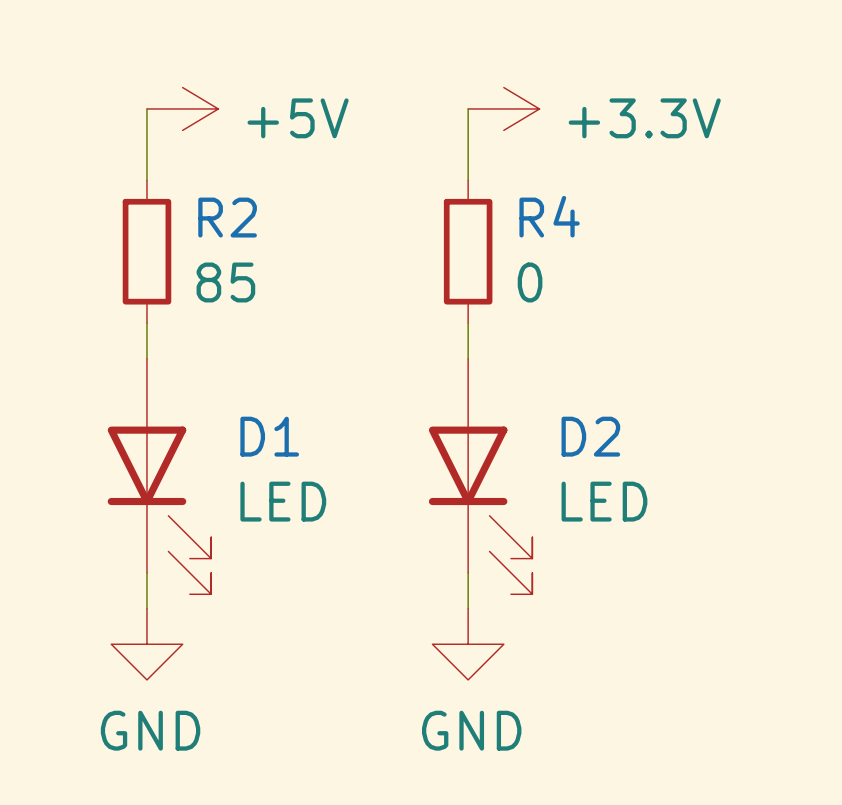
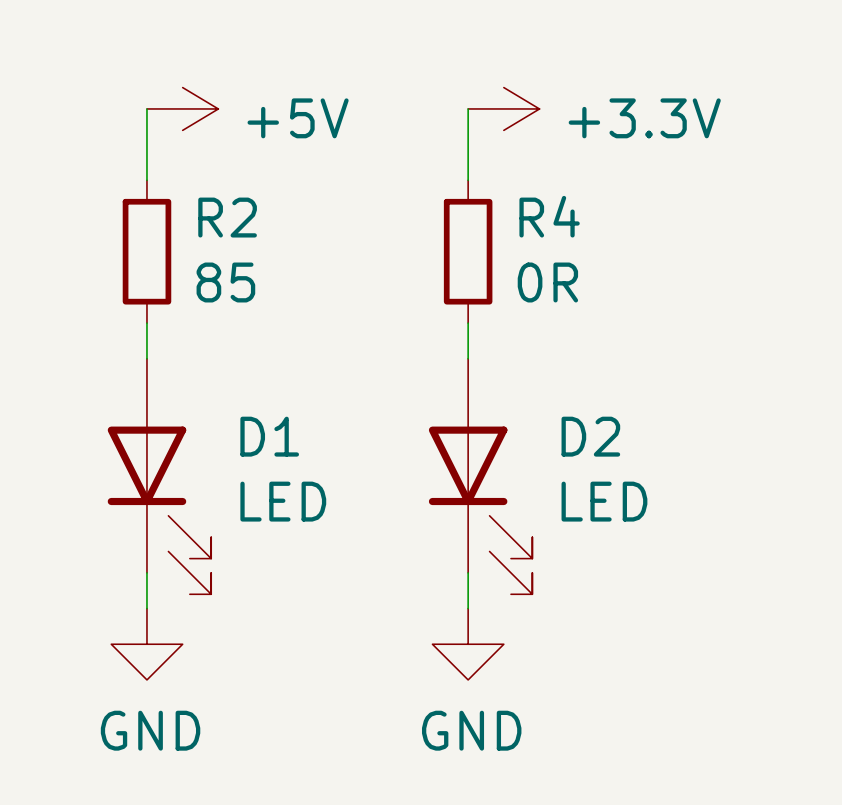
R4 value: 0 (530, 282) -> 0R (547, 282)

